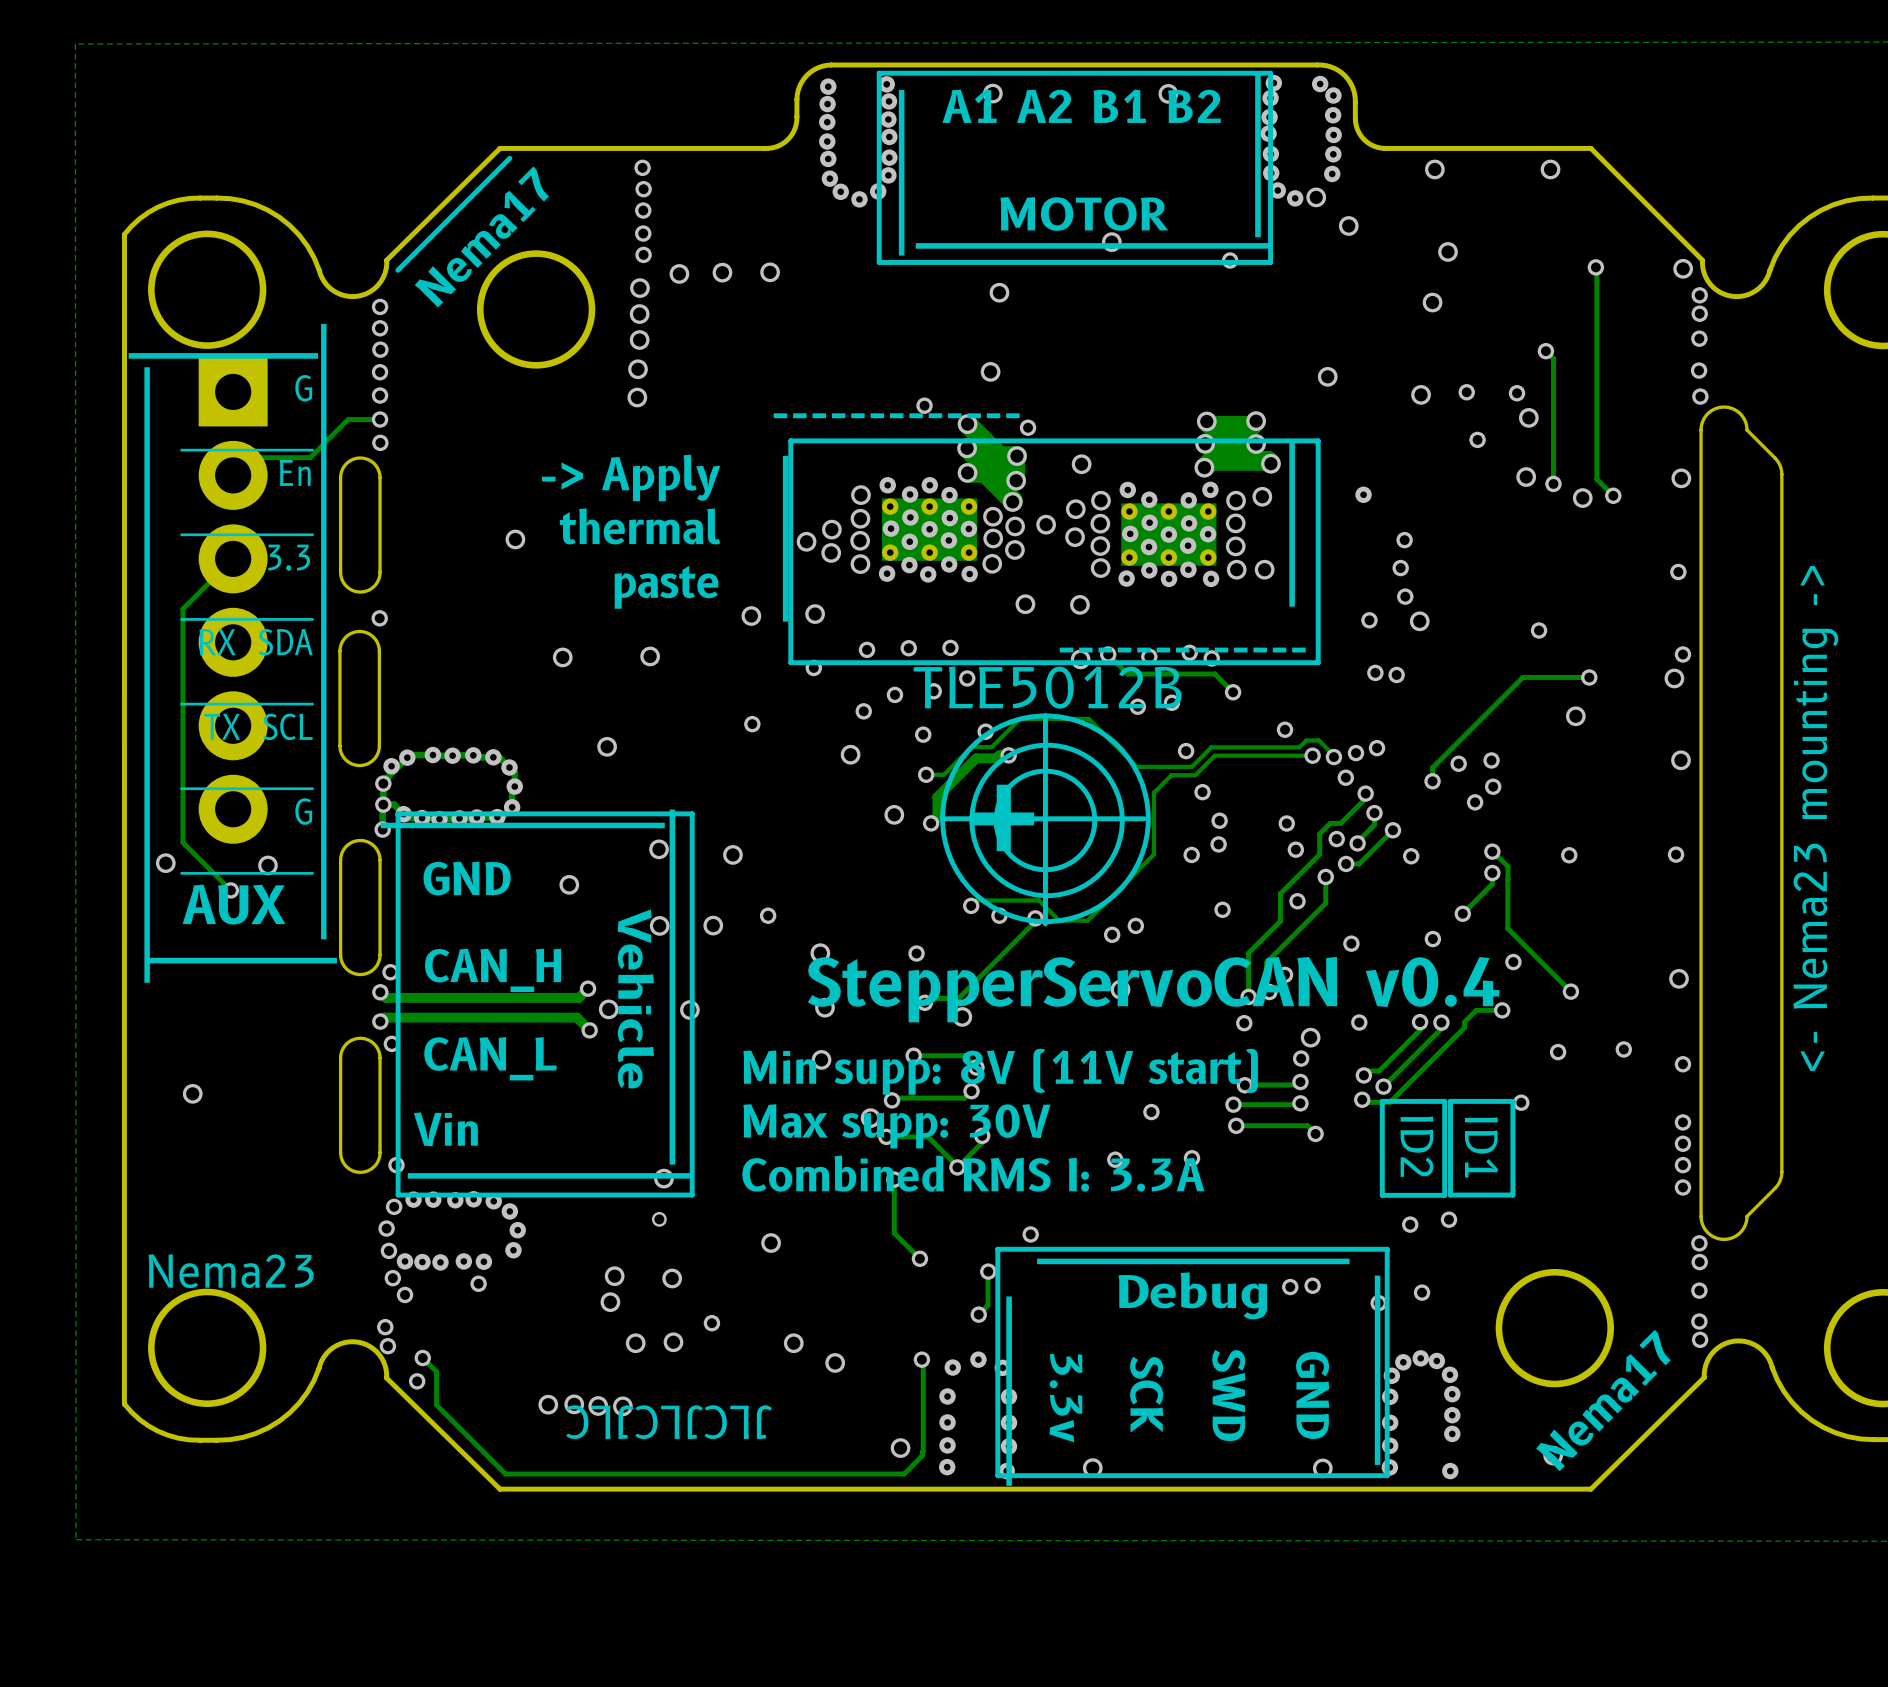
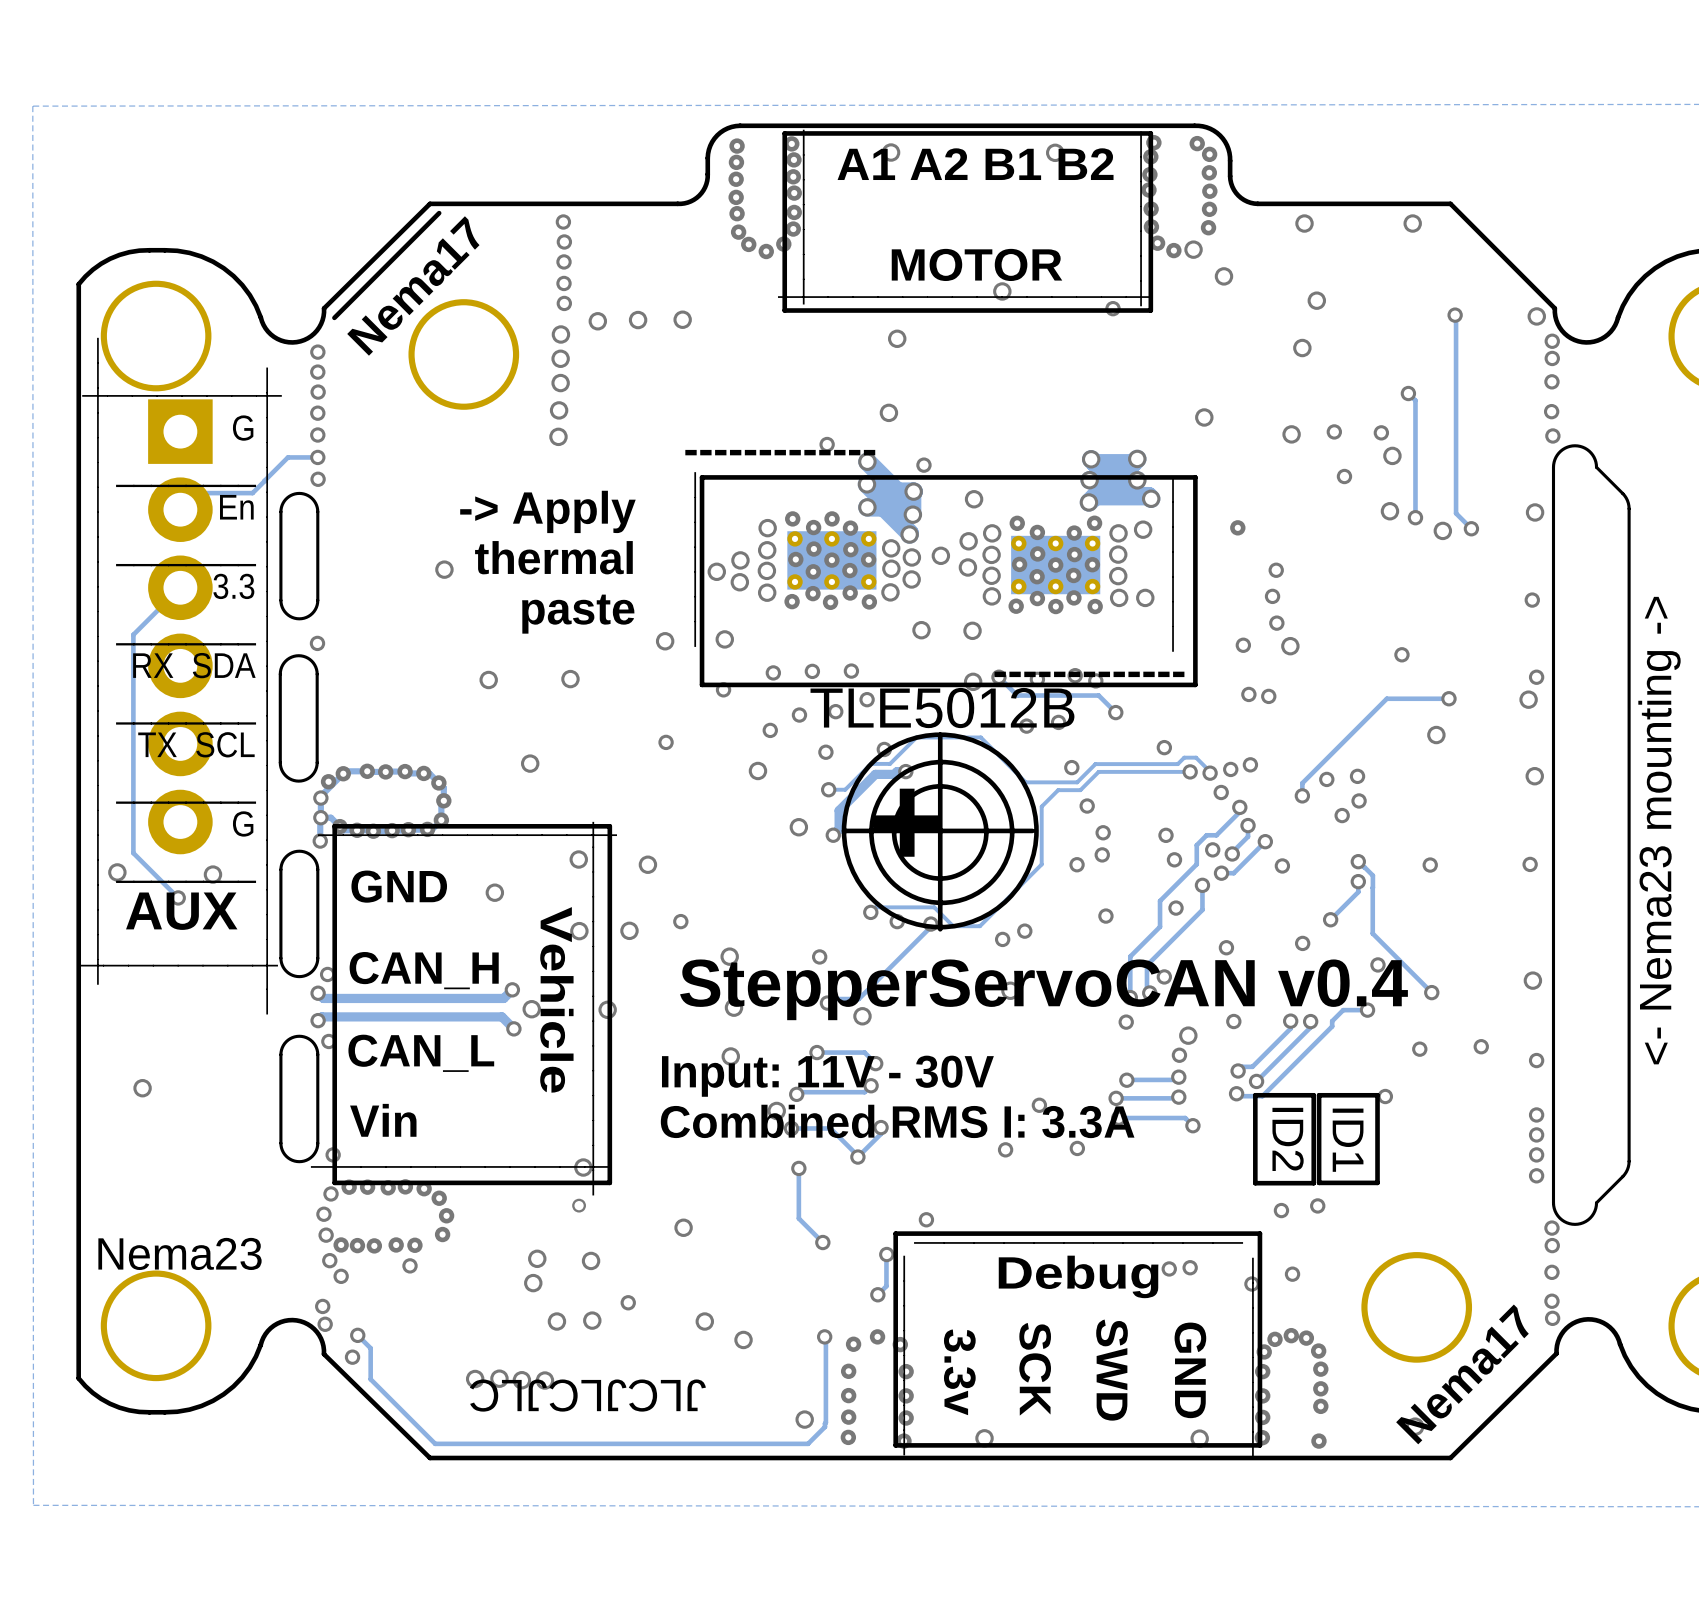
text: Min supp: 8V (11V start) (1000, 1071) -> Input: 11V - 30V (827, 1076)
text: Max supp: 30V (896, 1126) -> Combined RMS I: 3.3A (897, 1121)
text: Combined RMS I: 3.3A (973, 1173) -> none

